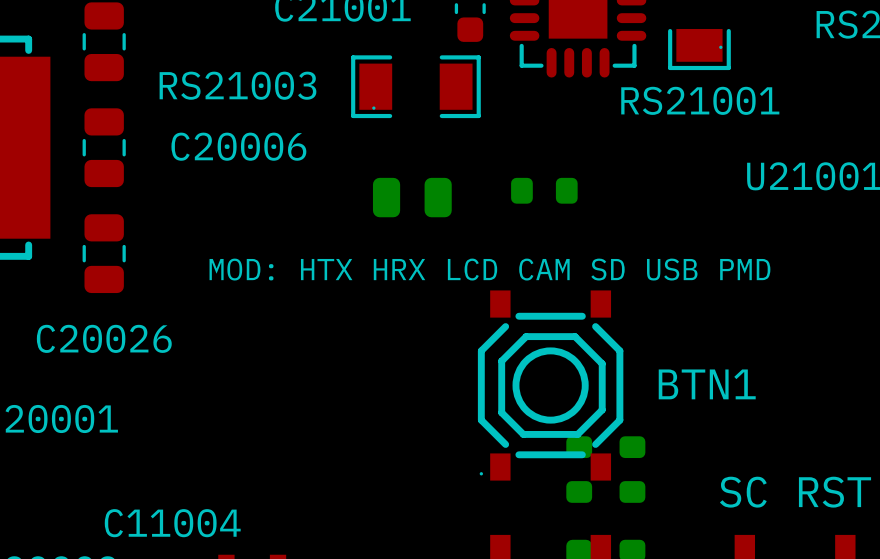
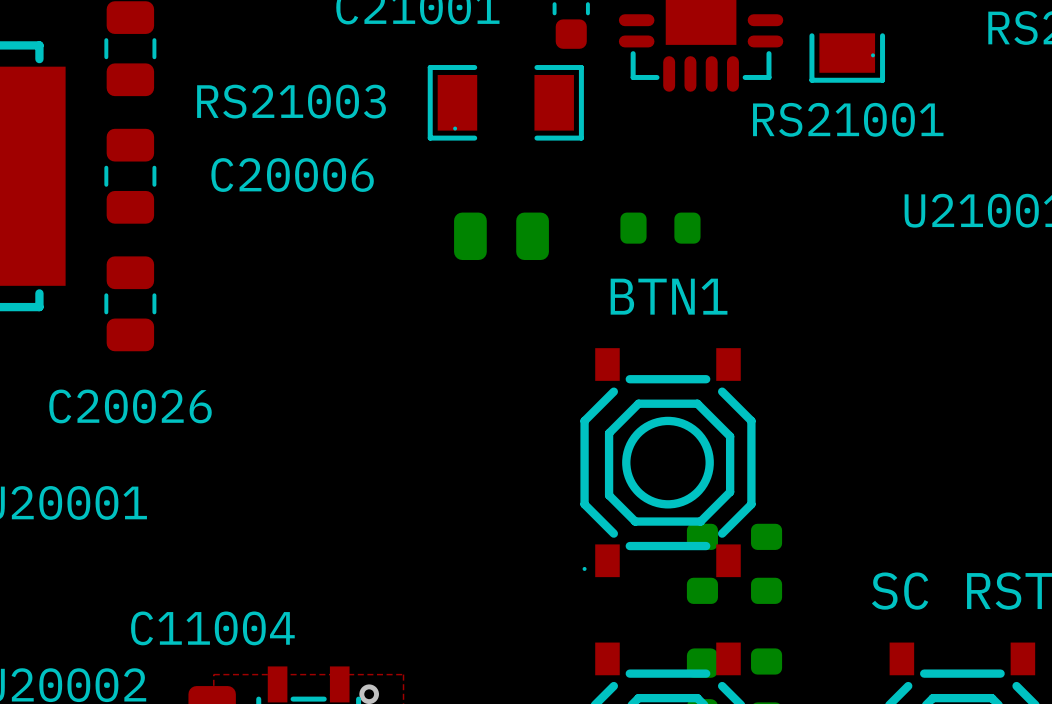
text: MOD: HTX HRX LCD CAM SD USB PMD (489, 269) -> none
text position: BTN1 (707, 384) -> BTN1 (669, 296)

